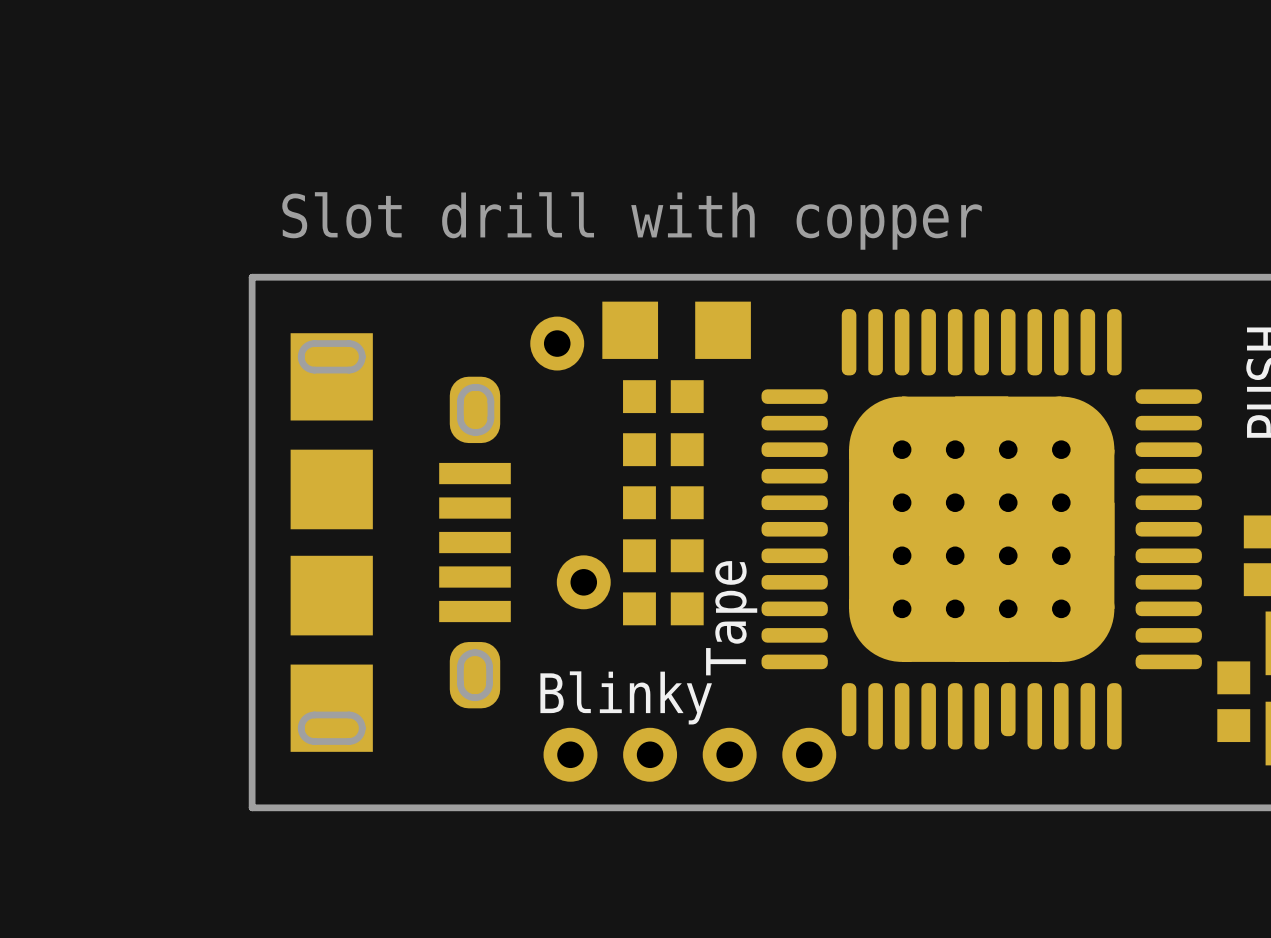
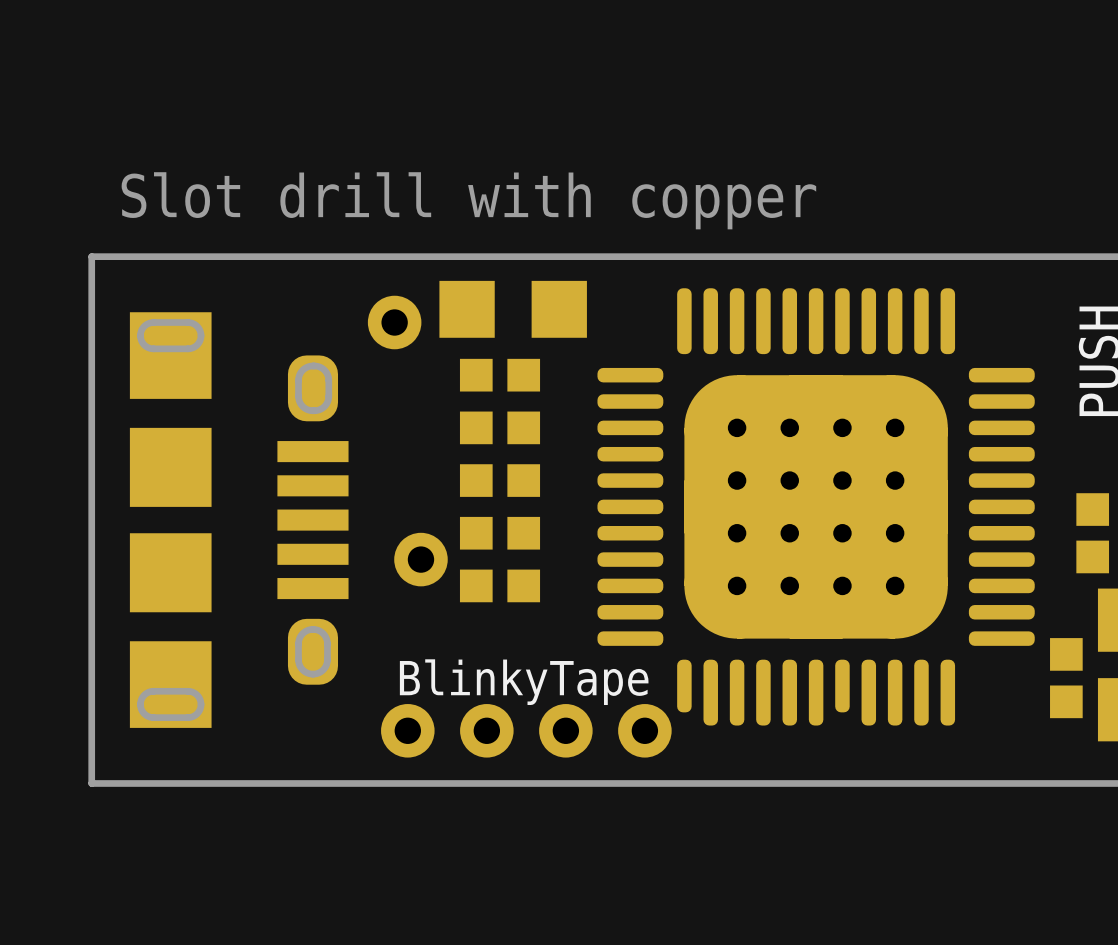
text: Tape (731, 618) -> none
text: Blinky (626, 697) -> BlinkyTape (524, 682)

